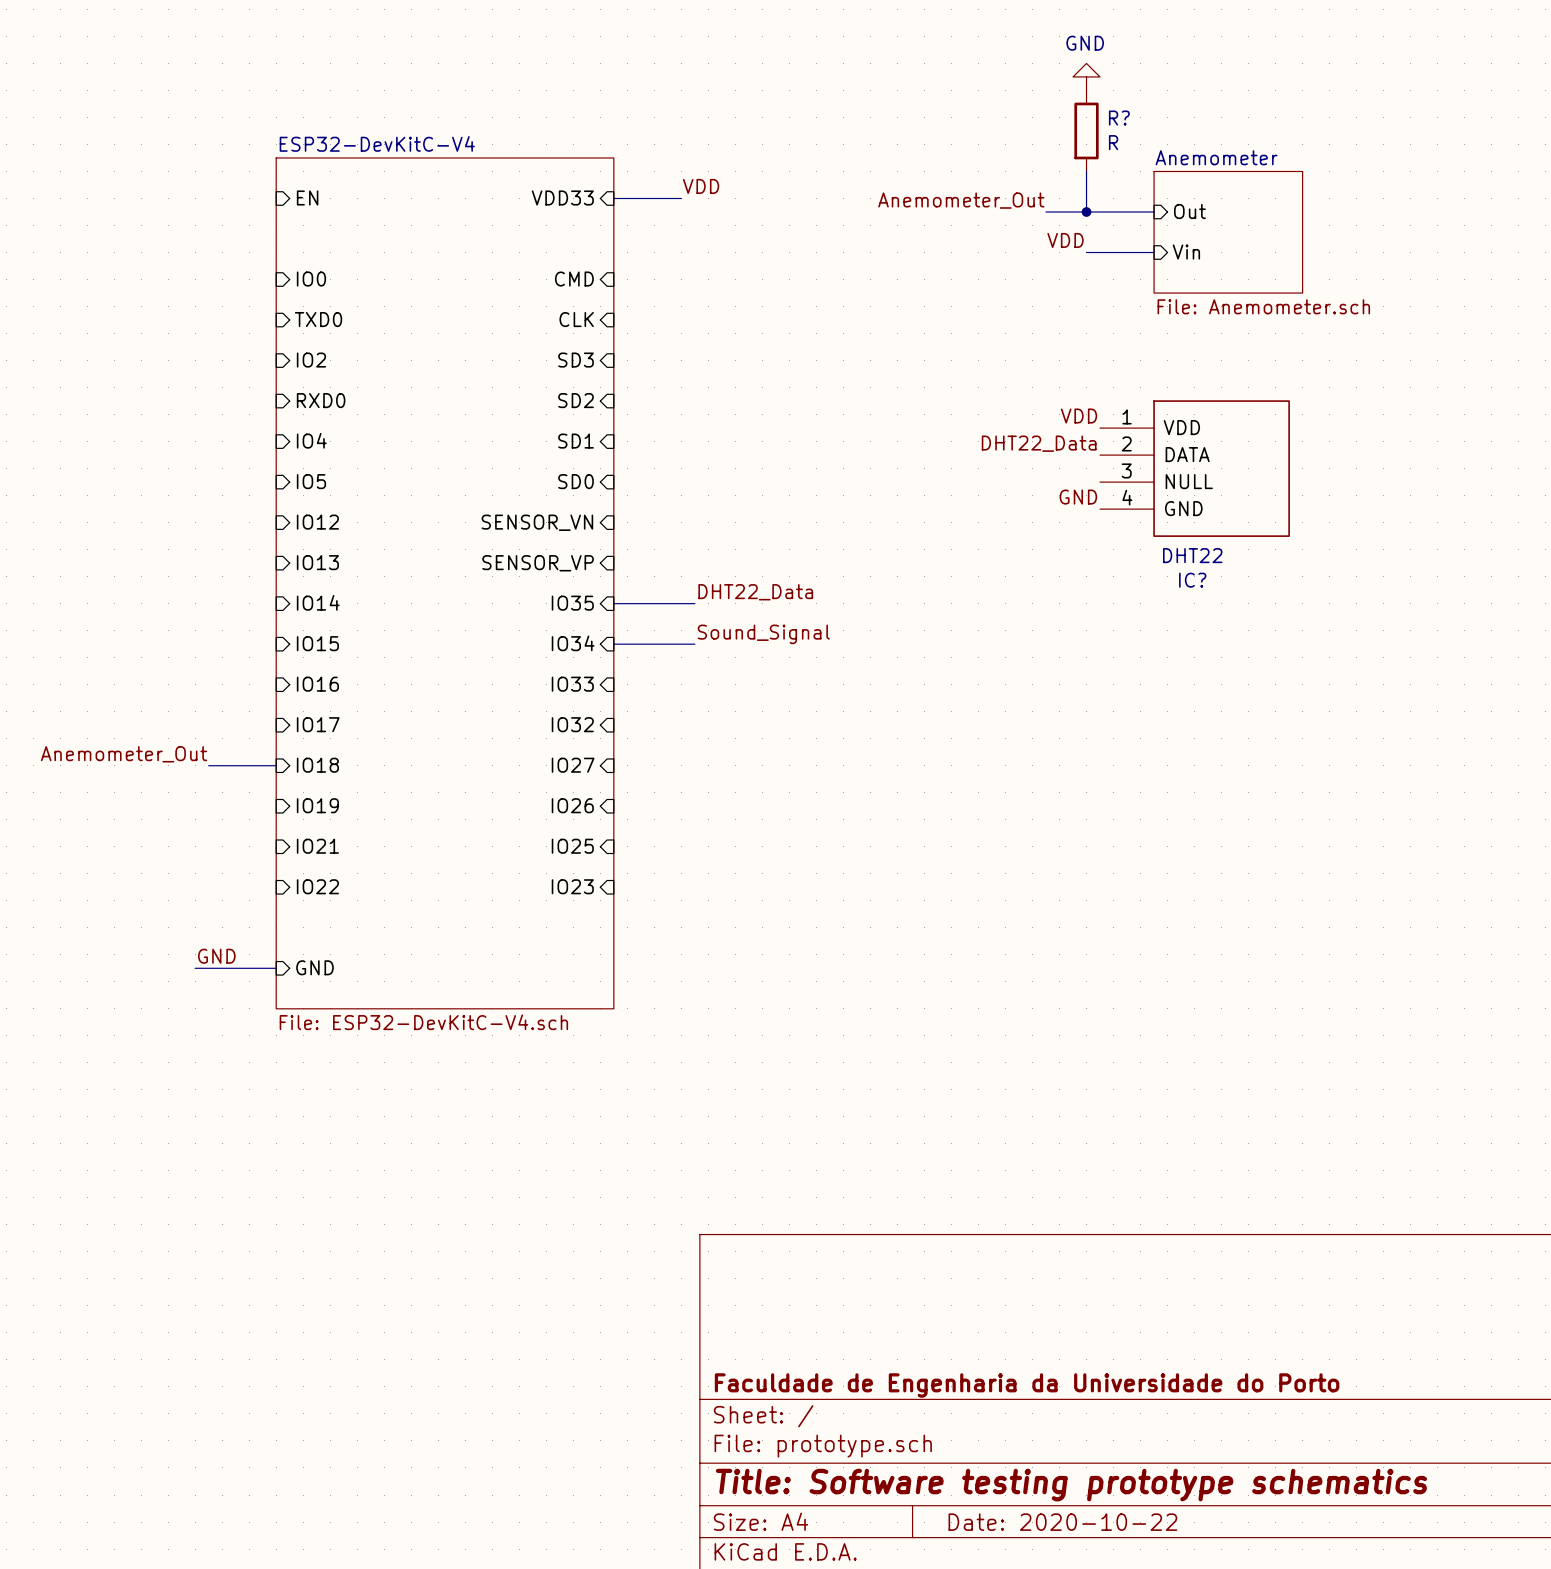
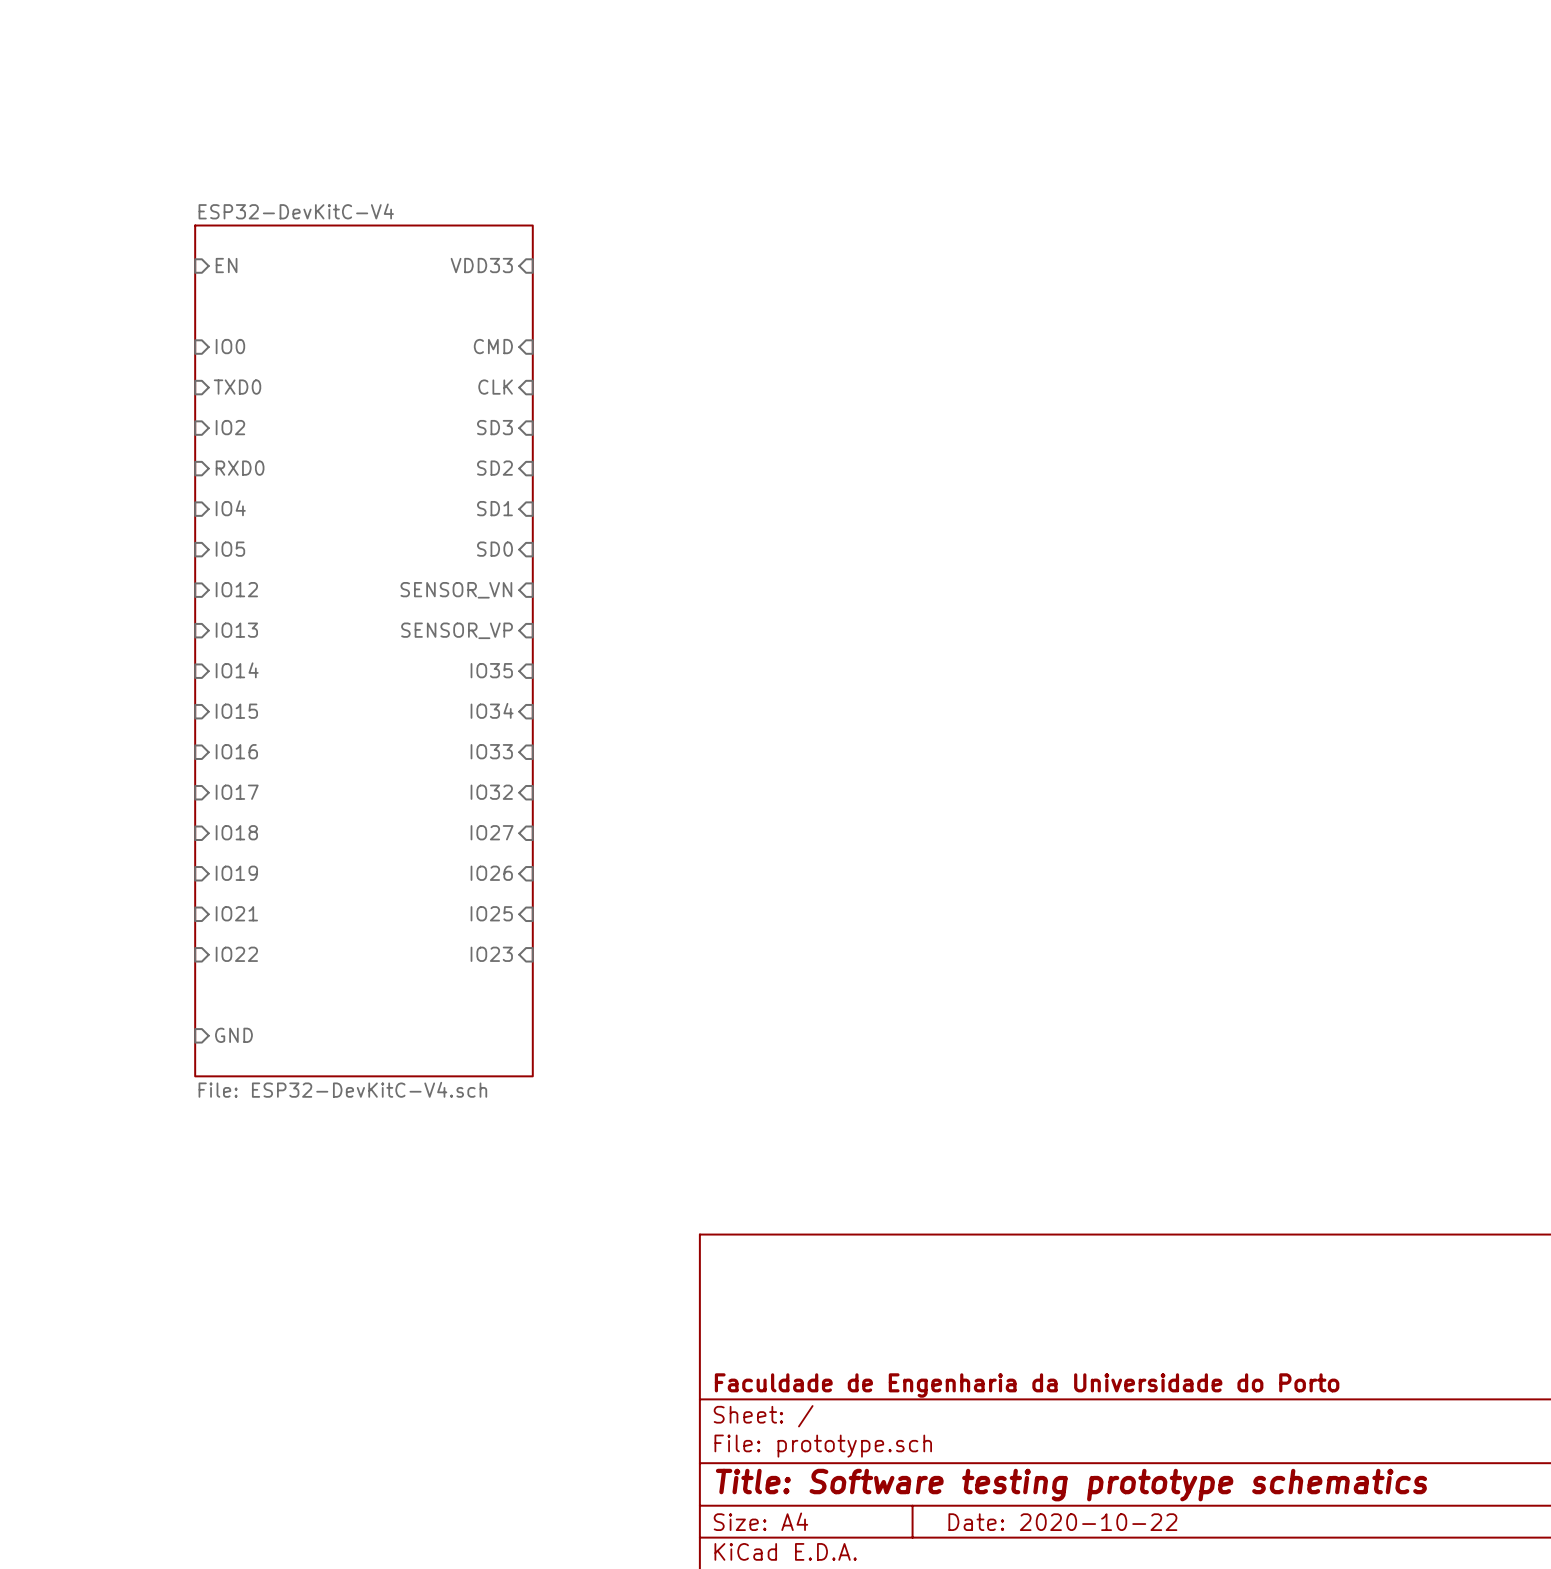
power symbol: GND (1086, 76) -> none
R?: R (1086, 130) -> none
wire: (1086, 171) (1086, 212) -> none
label: VDD (701, 186) -> none
sheet pin position: EN (307, 197) -> EN (226, 265)
sheet pin position: VDD33 (562, 197) -> VDD33 (481, 265)
wire: (613, 198) (681, 198) -> none
label: Anemometer_Out (961, 200) -> none
sheet pin: Out (1189, 211) -> none
wire: (1046, 212) (1154, 212) -> none
junction: (1086, 212) -> none
sheet Anemometer: File: Anemometer.sch (1228, 232) -> none
label: VDD (1065, 240) -> none
wire: (1086, 252) (1154, 252) -> none
sheet pin: Vin (1186, 252) -> none
sheet pin position: IO0 (311, 279) -> IO0 (230, 346)
sheet pin position: CMD (574, 279) -> CMD (493, 346)
sheet pin position: TXD0 (318, 319) -> TXD0 (237, 387)
sheet pin position: CLK (576, 319) -> CLK (495, 387)
sheet pin position: IO2 (311, 360) -> IO2 (230, 427)
sheet pin position: SD3 (576, 360) -> SD3 (494, 427)
sheet pin position: RXD0 (321, 400) -> RXD0 (240, 468)
sheet pin position: SD2 (576, 400) -> SD2 (494, 468)
label: VDD (1079, 416) -> none
sheet pin position: IO4 (311, 440) -> IO4 (230, 508)
sheet pin position: SD1 (576, 441) -> SD1 (494, 508)
label: DHT22_Data (1039, 443) -> none
IC?: DHT22 (1194, 468) -> none
sheet pin position: IO5 (311, 481) -> IO5 (230, 549)
sheet pin position: SD0 (576, 481) -> SD0 (494, 549)
label: GND (1078, 497) -> none
sheet pin position: IO12 (317, 522) -> IO12 (236, 589)
sheet pin position: SENSOR_VN (537, 522) -> SENSOR_VN (456, 590)
sheet pin position: IO13 (317, 562) -> IO13 (236, 630)
sheet pin position: SENSOR_VP (538, 563) -> SENSOR_VP (457, 630)
sheet ESP32-DevKitC-V4 position: (445, 583) -> (363, 650)
label: DHT22_Data (755, 592) -> none
sheet pin position: IO14 (318, 602) -> IO14 (237, 670)
sheet pin position: IO35 (572, 603) -> IO35 (491, 670)
wire: (613, 603) (694, 603) -> none
label: Sound_Signal (763, 634) -> none
sheet pin position: IO15 (317, 643) -> IO15 (236, 711)
sheet pin position: IO34 (573, 643) -> IO34 (492, 710)
wire: (613, 644) (694, 644) -> none
sheet pin position: IO16 (317, 684) -> IO16 (236, 751)
sheet pin position: IO33 (572, 684) -> IO33 (491, 751)
sheet pin position: IO17 (318, 724) -> IO17 (237, 792)
sheet pin position: IO32 (572, 724) -> IO32 (491, 792)
label: Anemometer_Out (124, 754) -> none
wire: (208, 765) (276, 765) -> none
sheet pin position: IO18 (317, 765) -> IO18 (236, 832)
sheet pin position: IO27 (573, 765) -> IO27 (492, 832)
sheet pin position: IO19 (317, 805) -> IO19 (236, 873)
sheet pin position: IO26 (572, 805) -> IO26 (491, 873)
sheet pin position: IO21 (317, 846) -> IO21 (236, 913)
sheet pin position: IO25 (572, 846) -> IO25 (491, 913)
sheet pin position: IO22 (317, 886) -> IO22 (236, 954)
sheet pin position: IO23 (572, 886) -> IO23 (491, 954)
label: GND (216, 956) -> none
sheet pin position: GND (315, 967) -> GND (233, 1035)
wire: (195, 968) (276, 968) -> none

